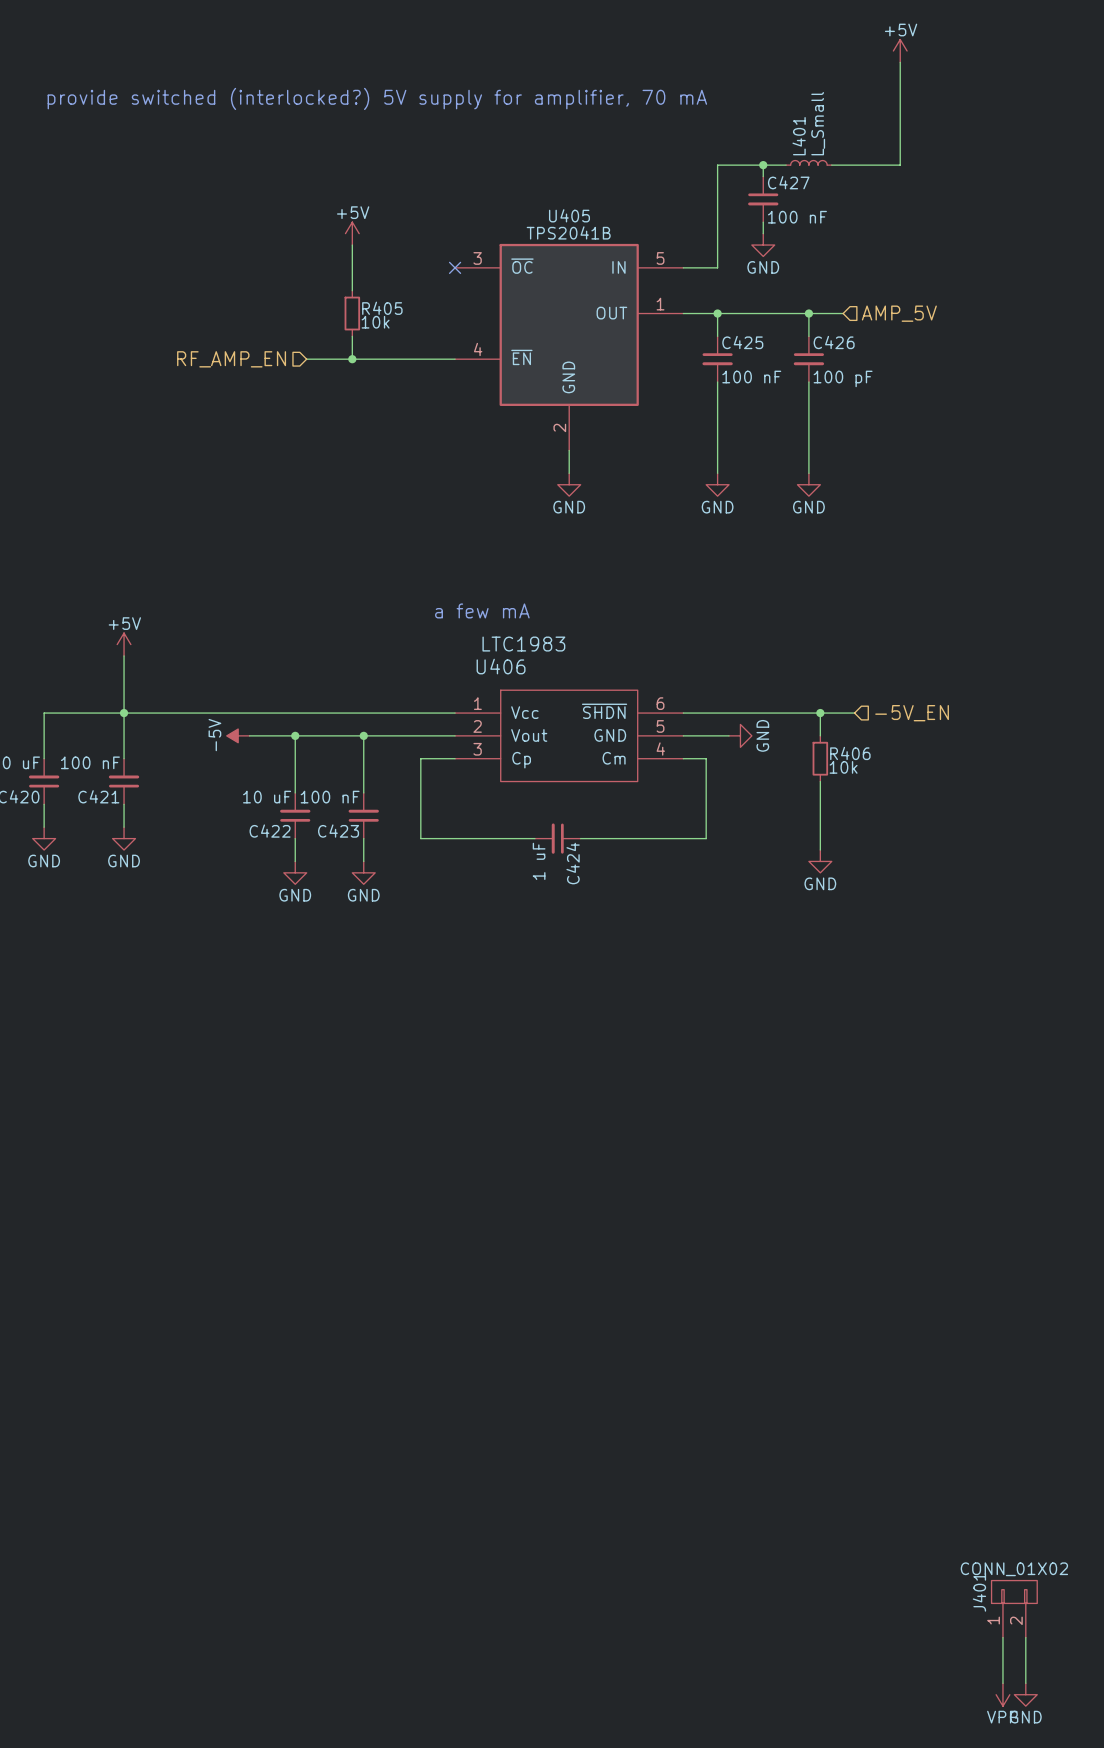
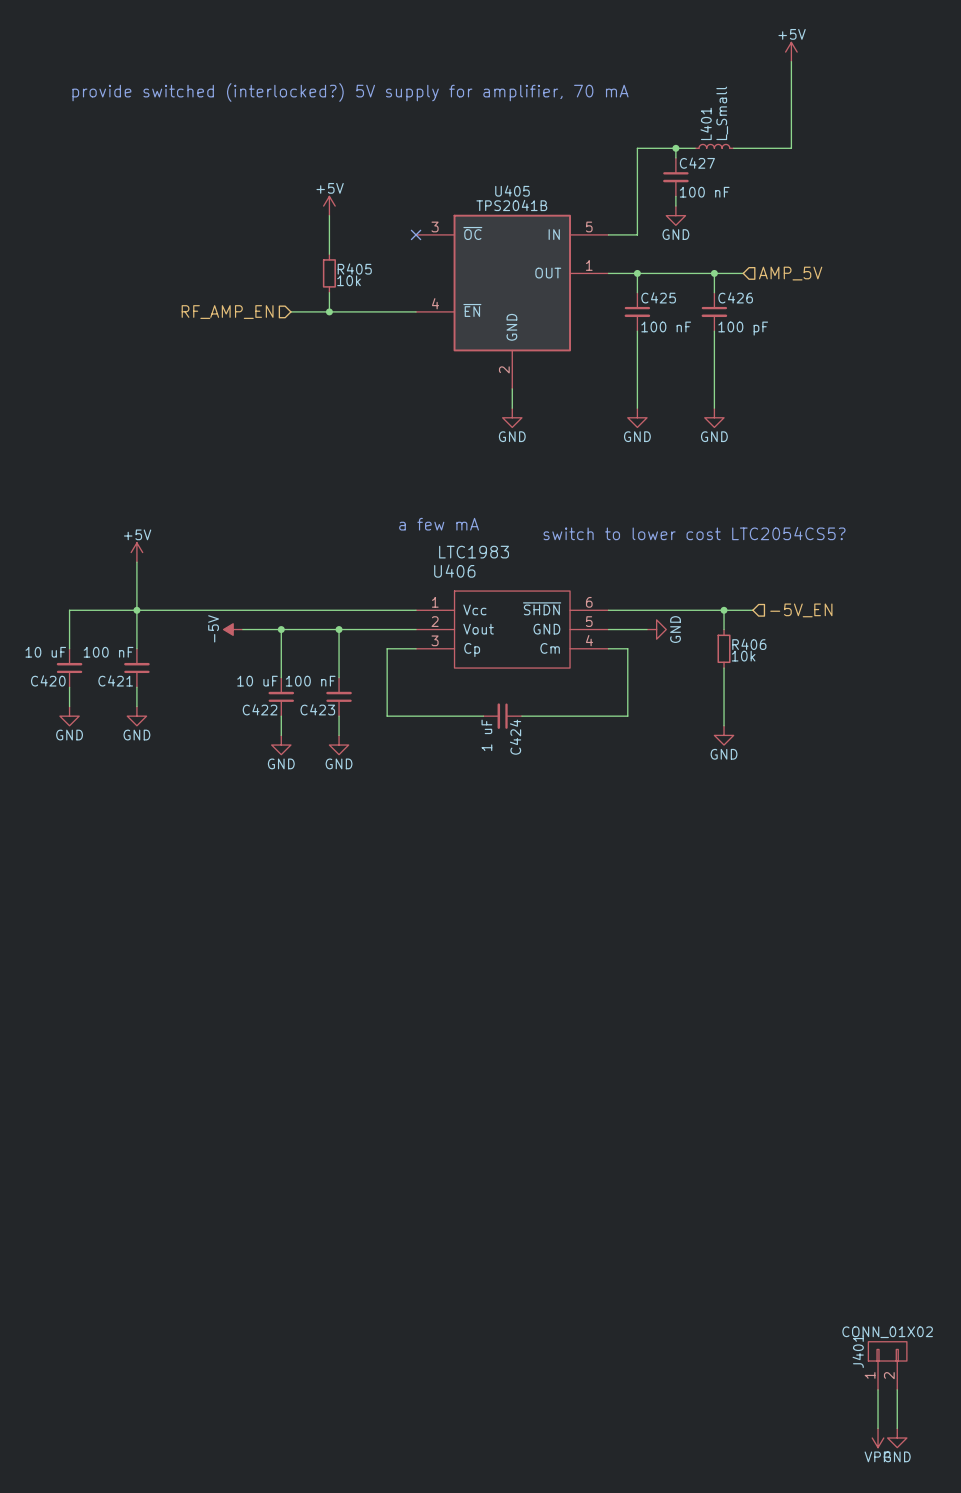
text: none -> switch to lower cost LTC2054CS5? (694, 533)

